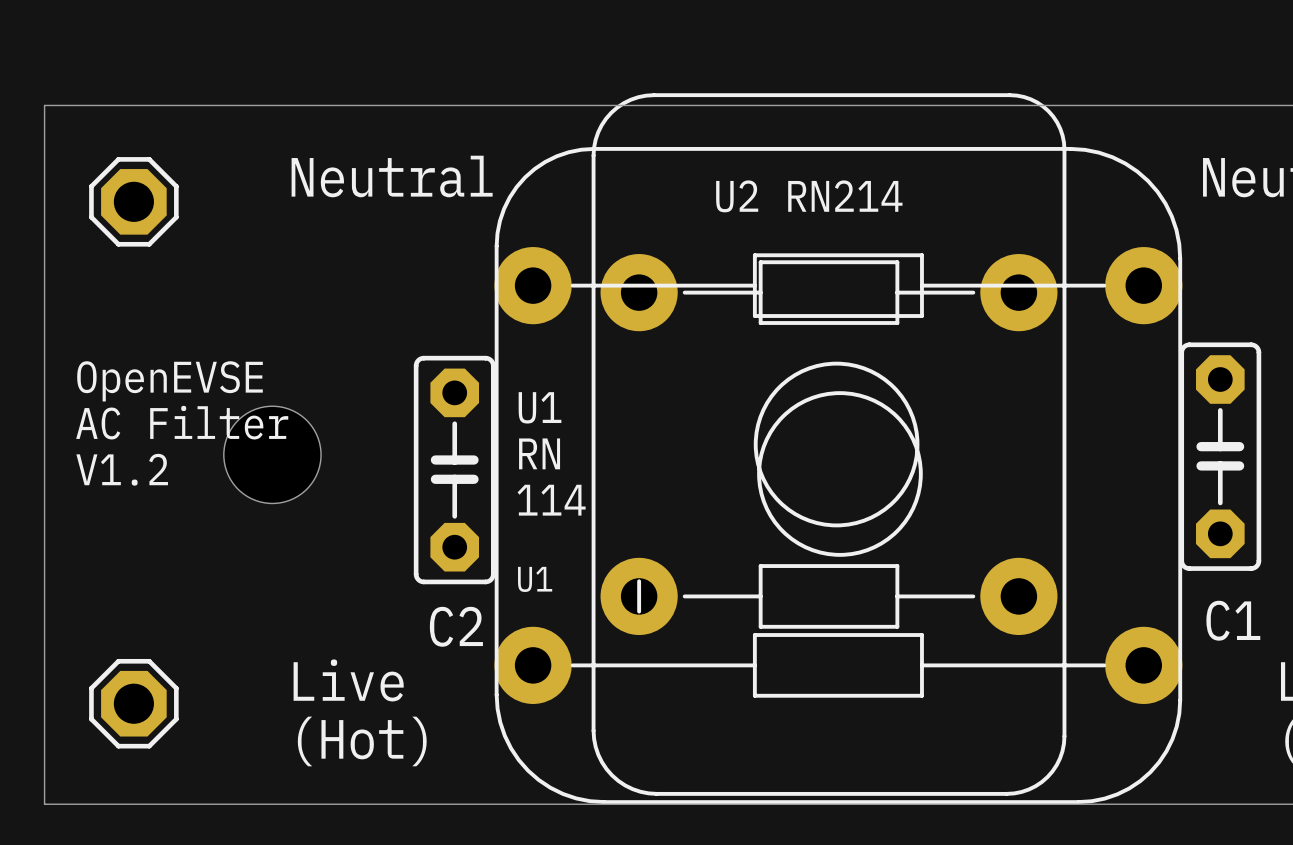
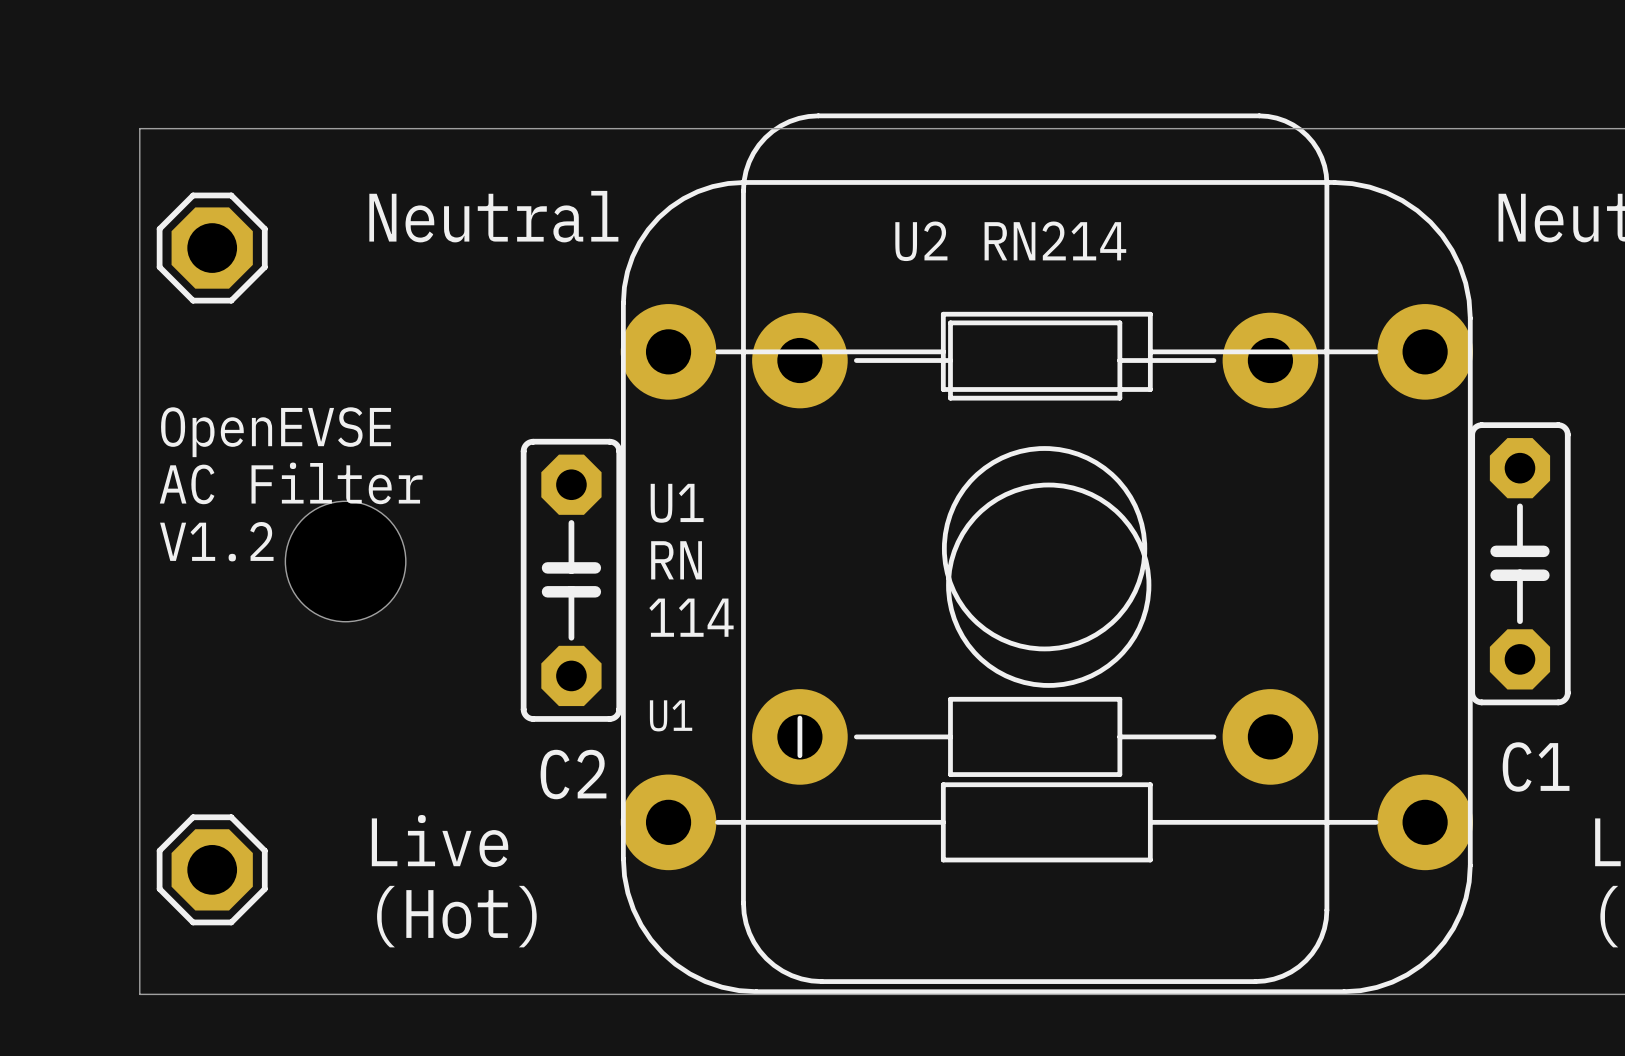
board edge: (106, 105) (44, 105) (44, 804) (106, 804) -> (139, 128) (139, 994)
part position: (133, 201) -> (212, 248)
text position: OpenEVSE (170, 381) -> OpenEVSE (276, 432)
text position: AC Filter (182, 422) -> AC Filter (291, 483)
text position: V1.2 (122, 469) -> V1.2 (216, 541)
part position: (133, 703) -> (212, 869)

